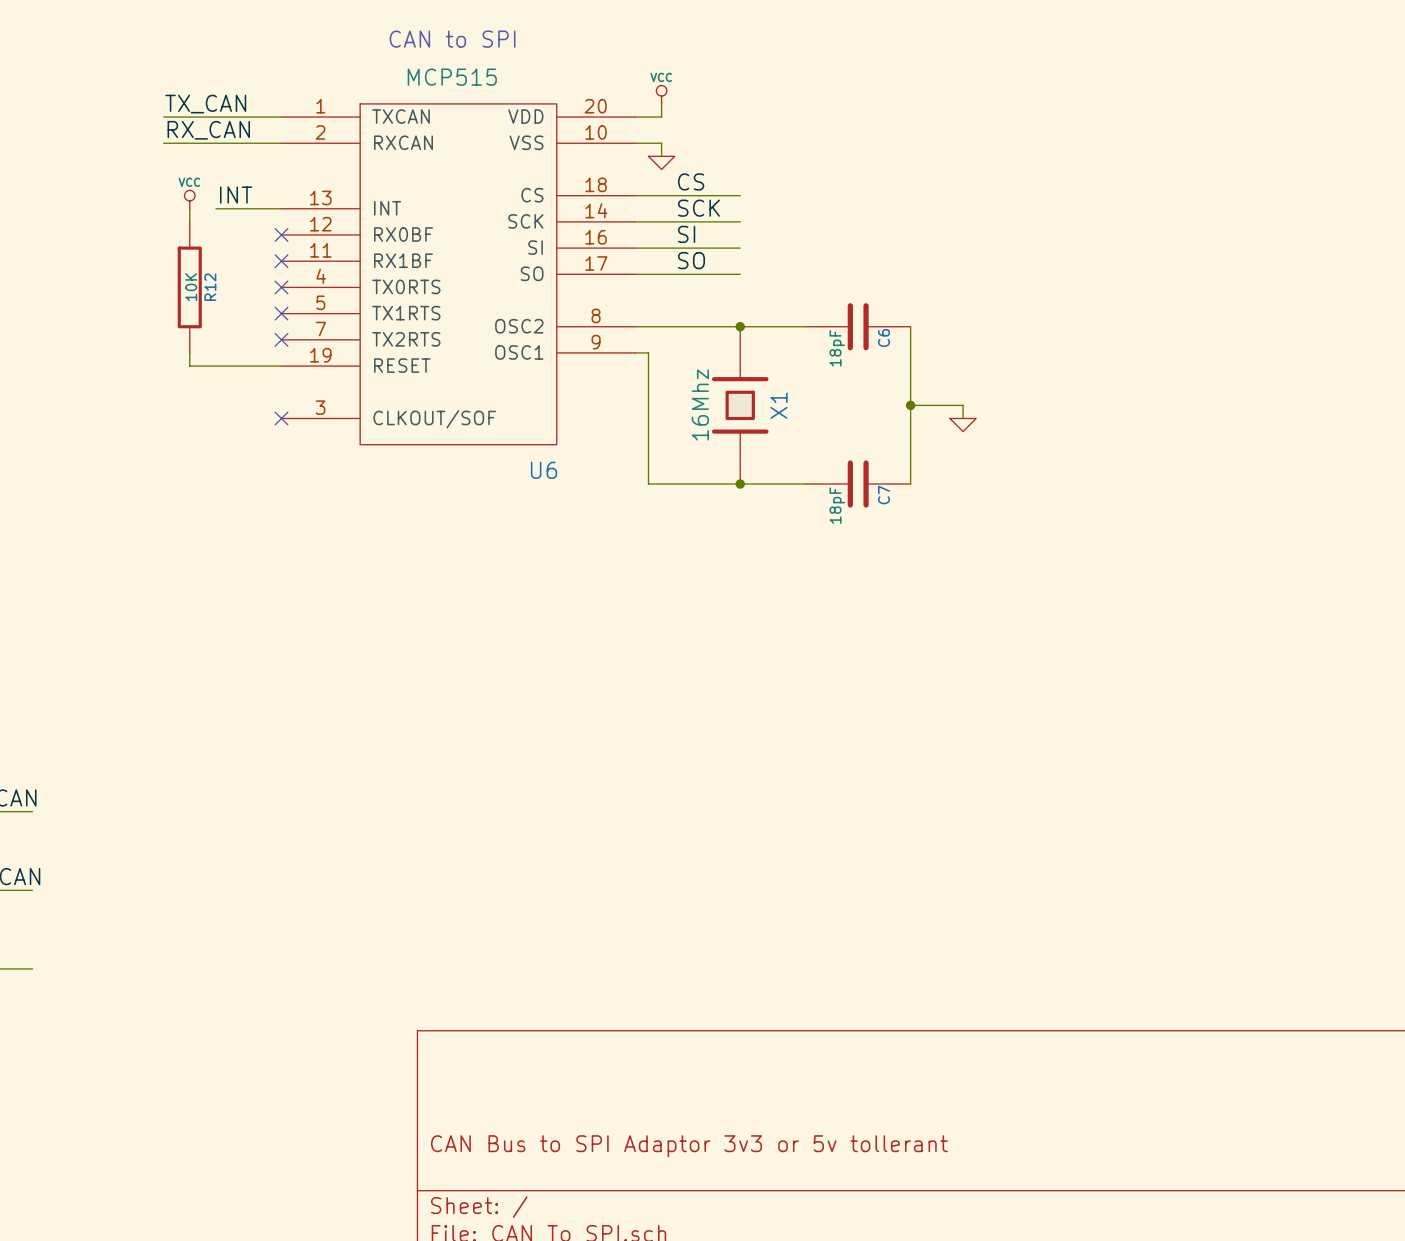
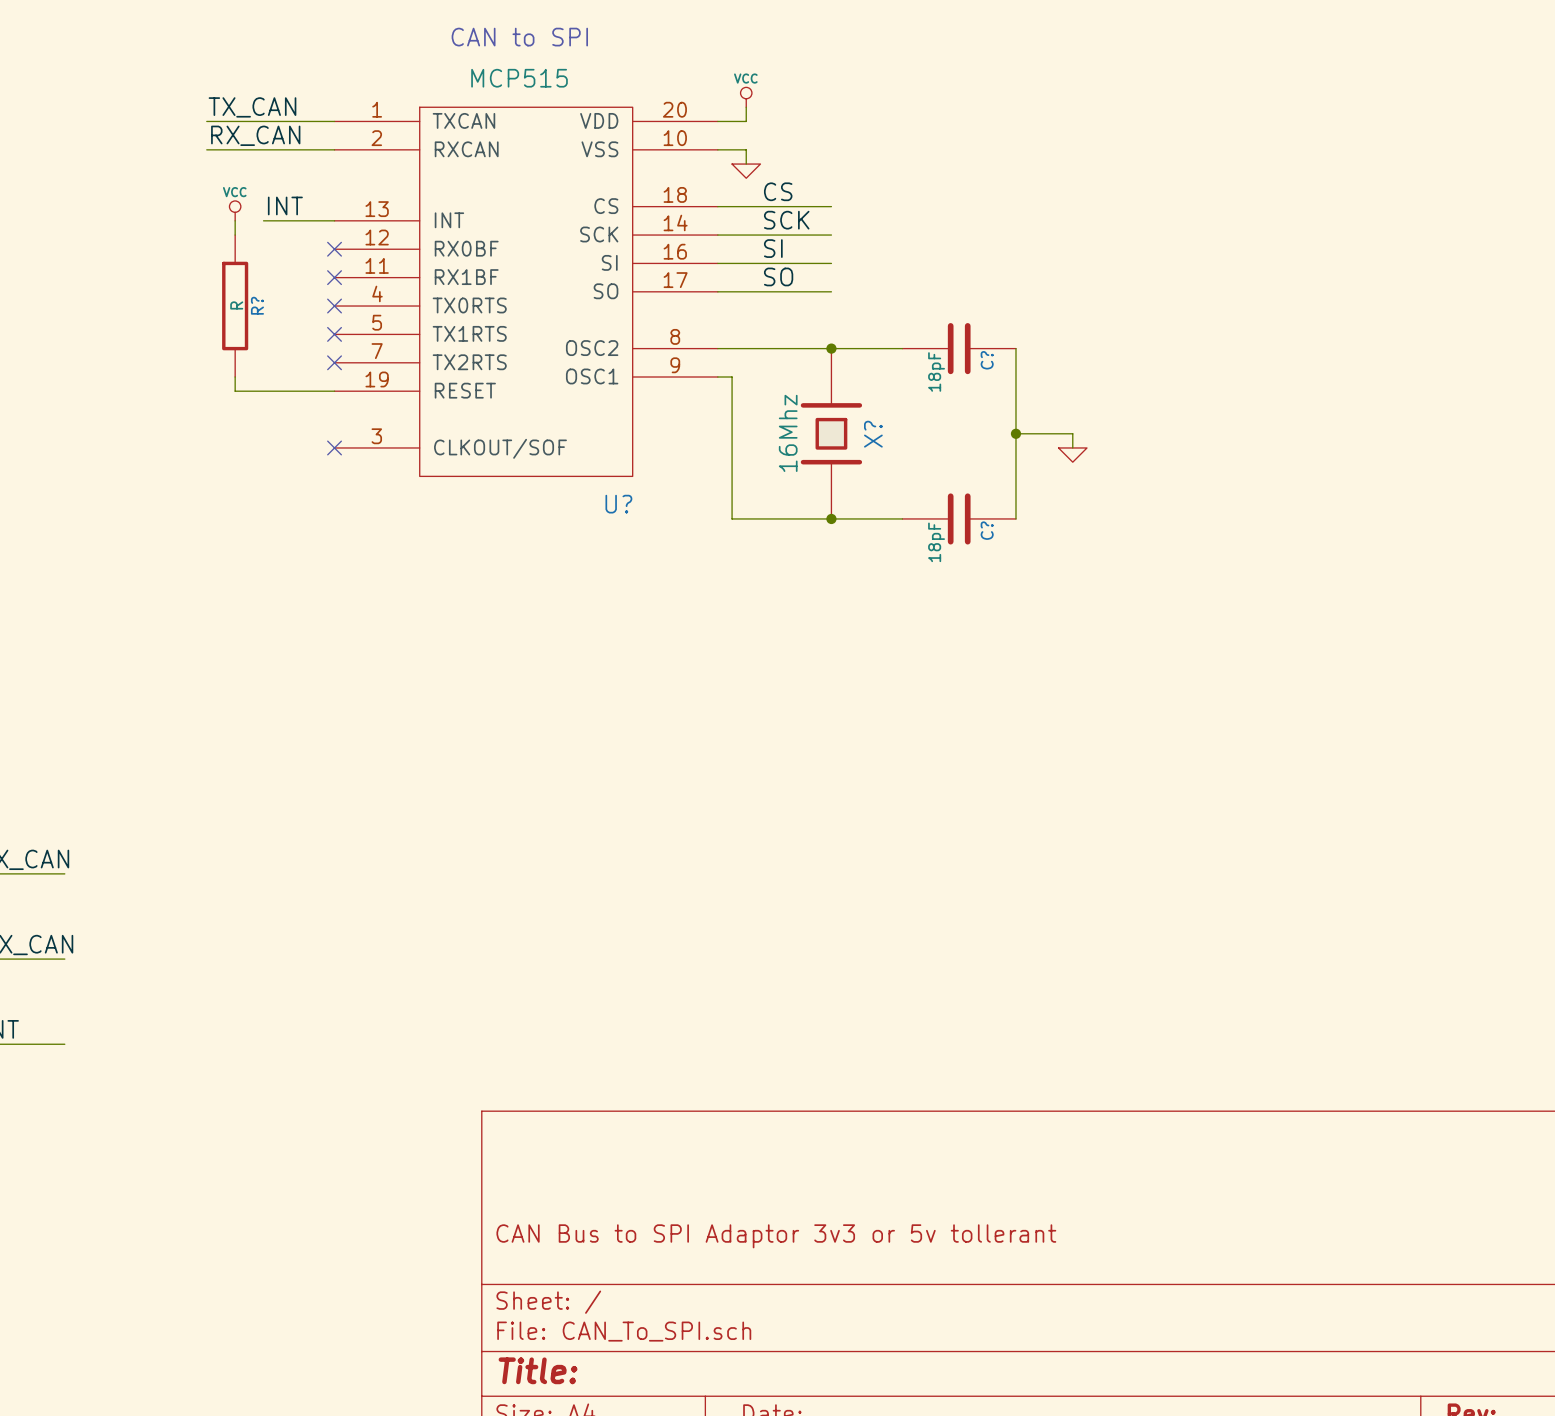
R12 value: 10K (191, 287) -> R (236, 305)
R12 name: R12 (210, 287) -> R? (257, 305)
C6 name: C6 (884, 338) -> C? (987, 360)
X1 name: X1 (778, 405) -> X? (873, 434)
U6 name: U6 (544, 470) -> U? (618, 504)
C7 name: C7 (884, 495) -> C? (987, 530)

